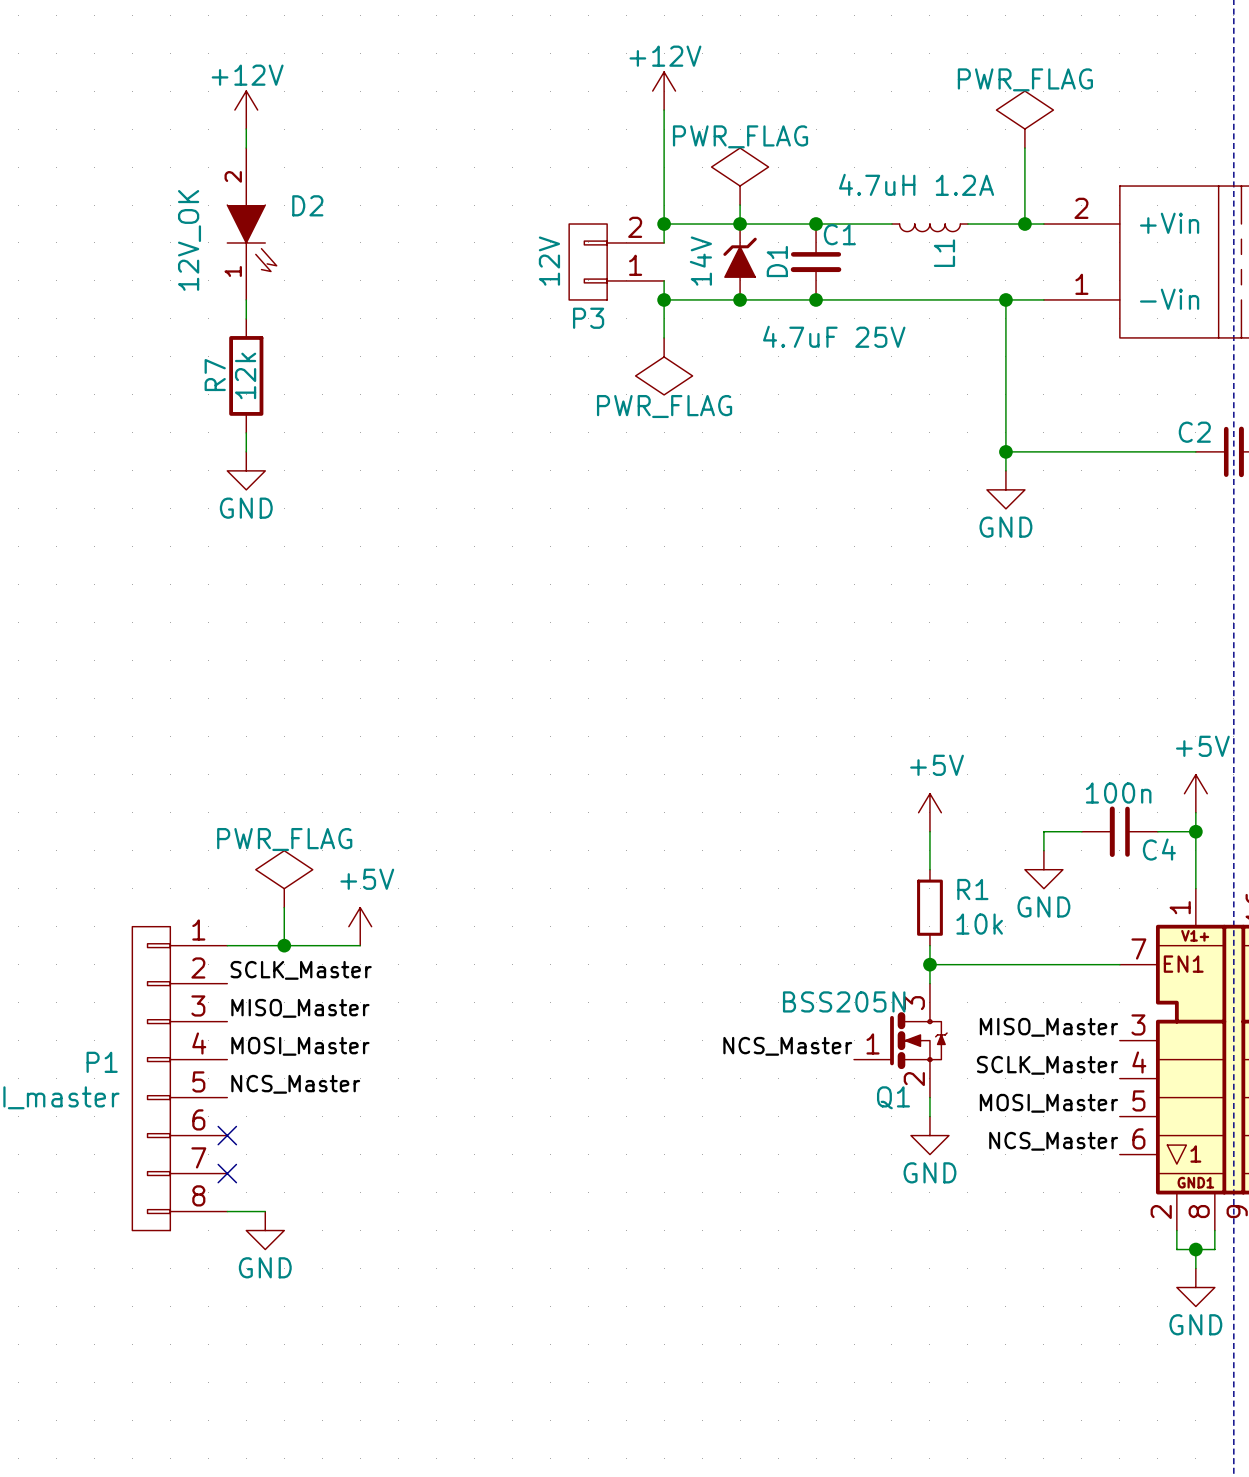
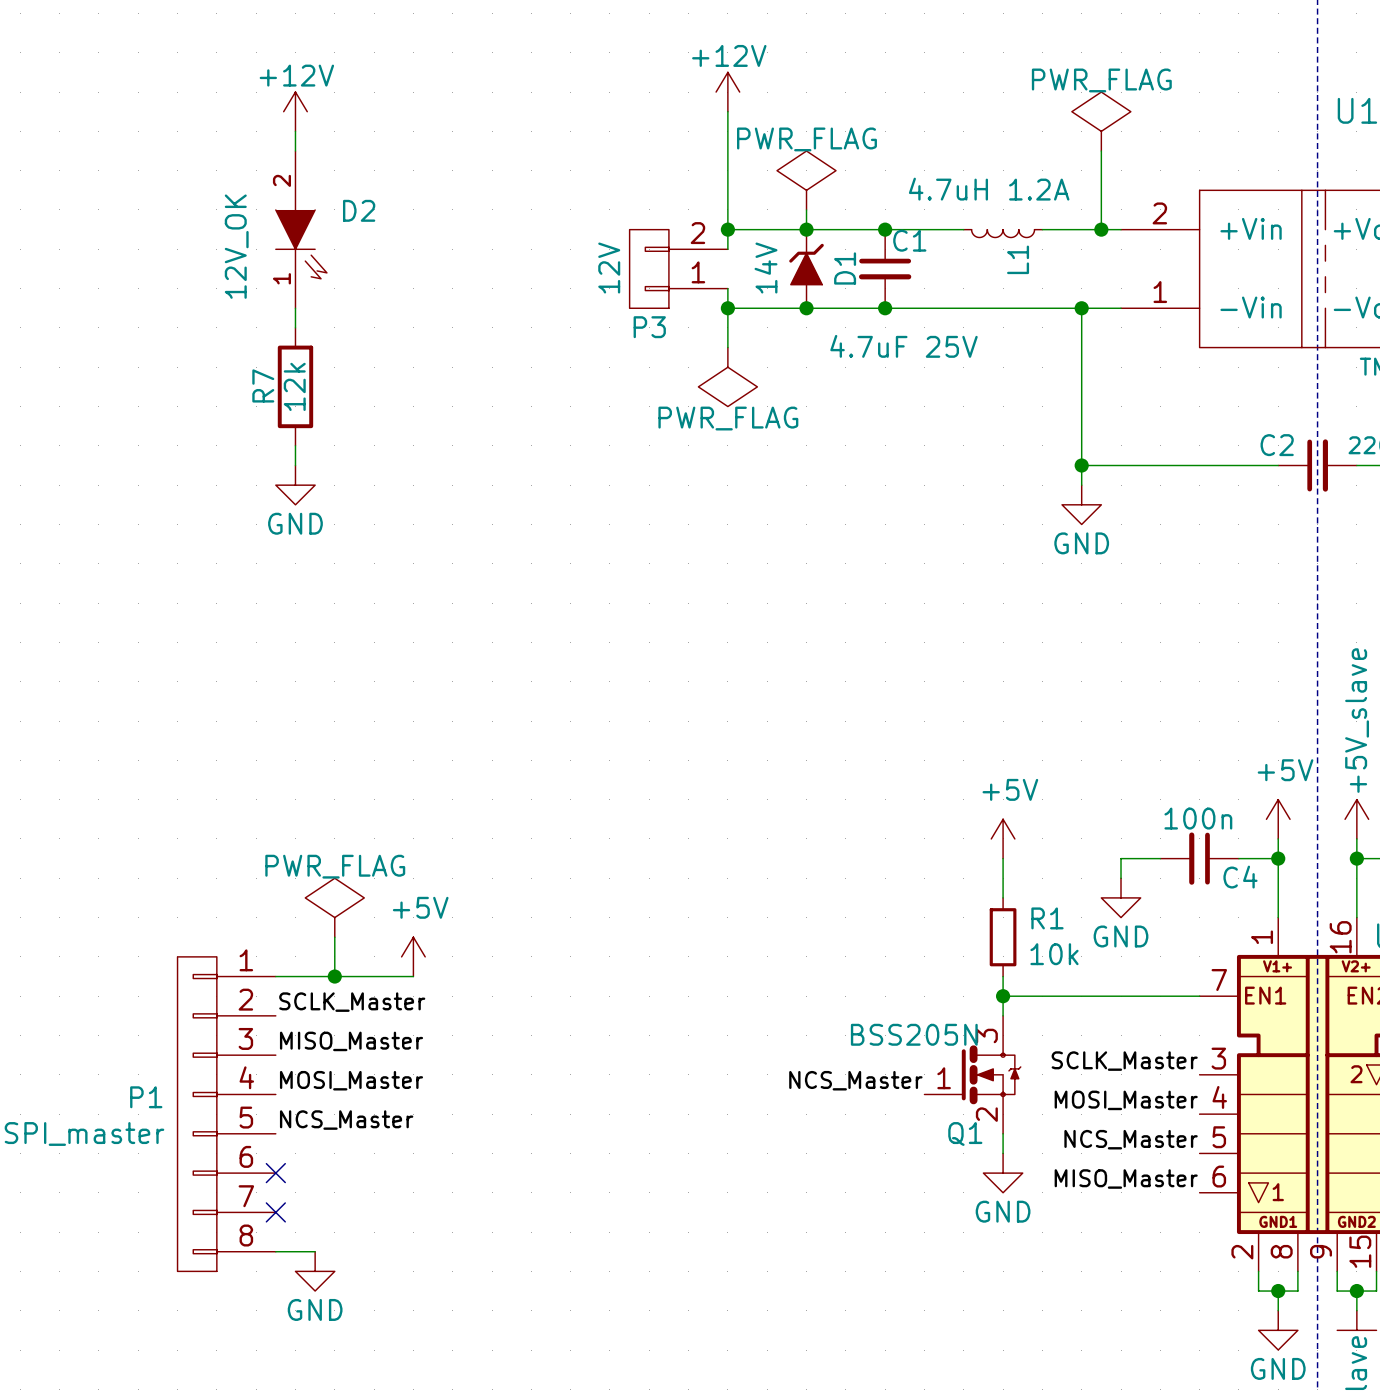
label: MISO_Master (1048, 1027) -> SCLK_Master (1124, 1061)
label: SCLK_Master (1047, 1065) -> MOSI_Master (1126, 1100)
label: MOSI_Master (1048, 1103) -> NCS_Master (1131, 1139)
label: NCS_Master (1053, 1141) -> MISO_Master (1126, 1179)

